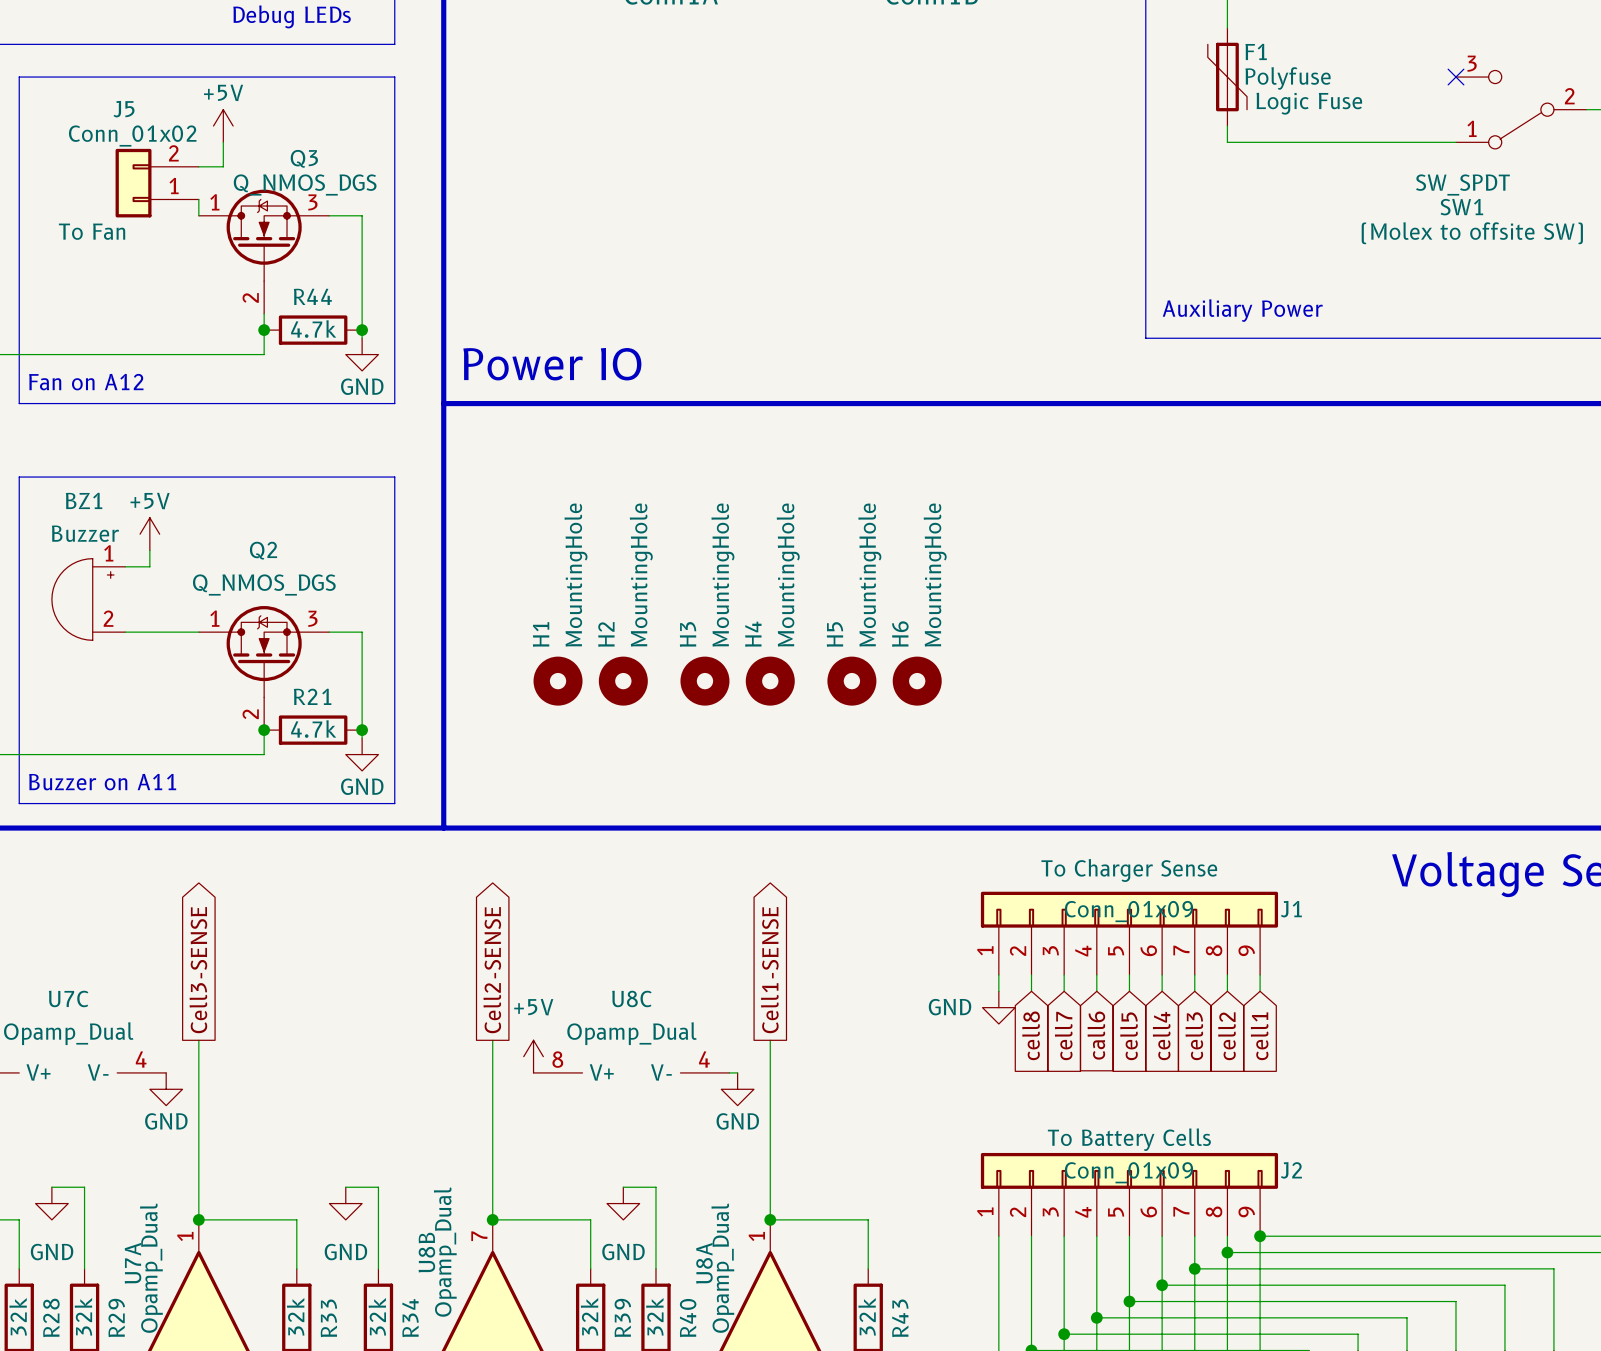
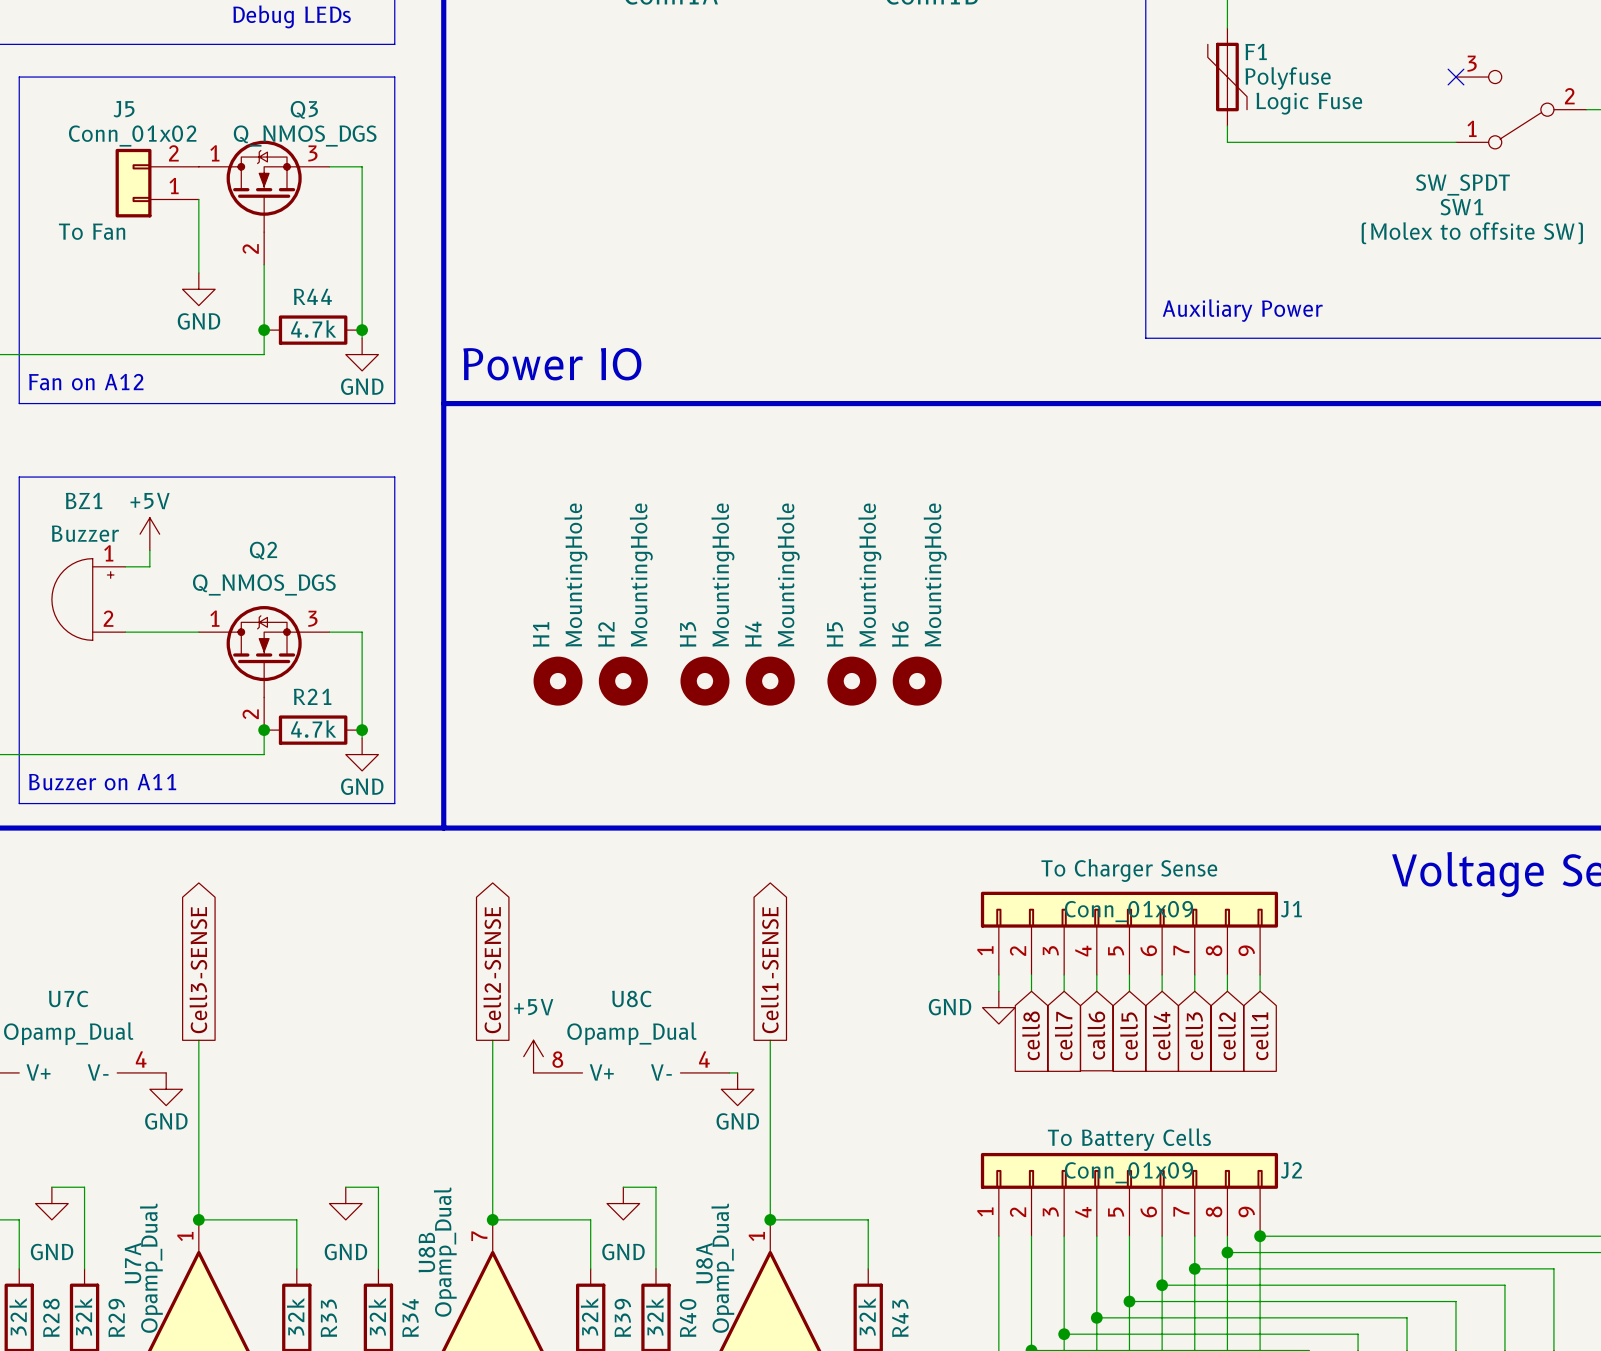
power symbol: +5V (223, 126) -> none
wire: (223, 142) (223, 166) (198, 166) -> none
wire: none -> (198, 215) (198, 272)
wire: (329, 215) (362, 215) -> (329, 166) (362, 166) (362, 215)
Q3 position: (264, 251) -> (264, 202)
power symbol: none -> GND (198, 289)

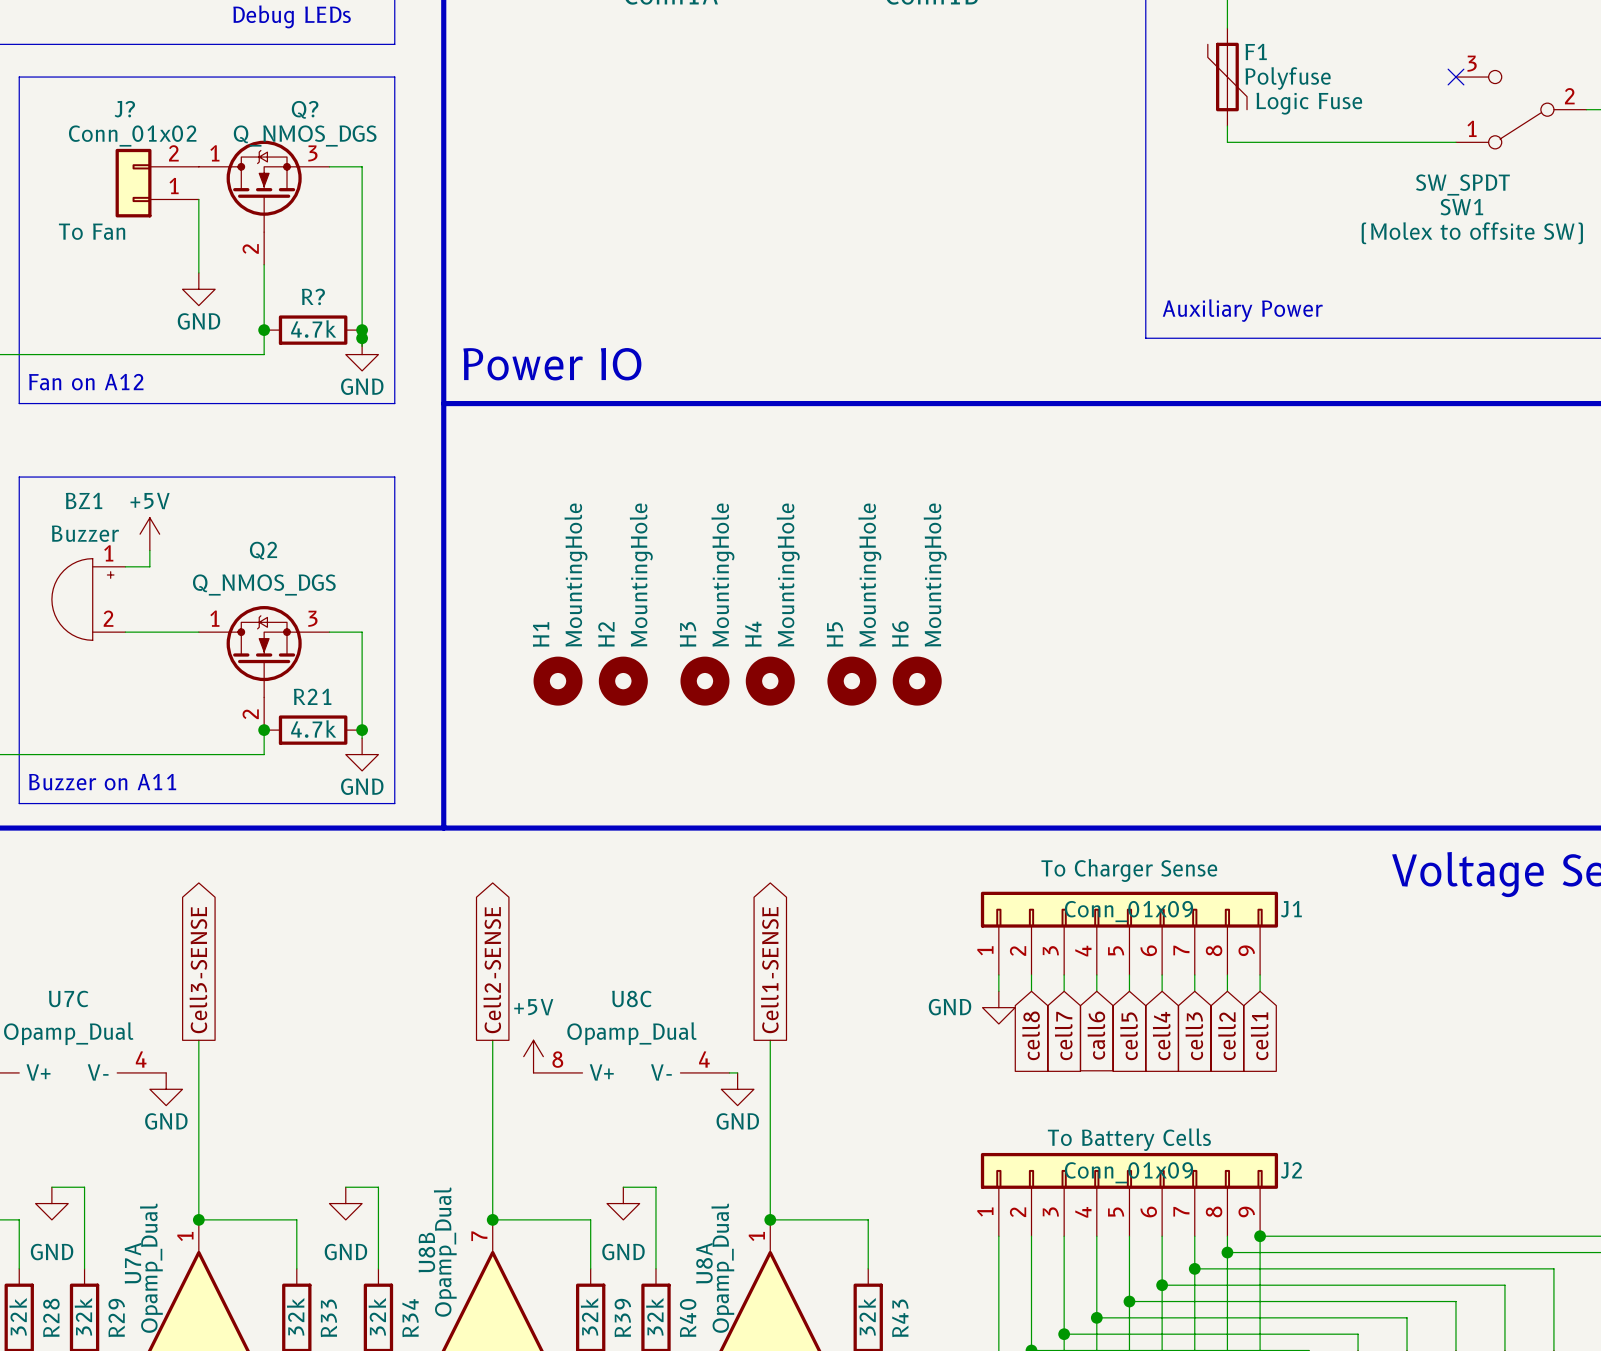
J5 name: J5 (124, 109) -> J? (124, 109)
Q3 name: Q3 (304, 109) -> Q? (305, 109)
R44 name: R44 (312, 296) -> R? (313, 296)
junction: none -> (362, 338)

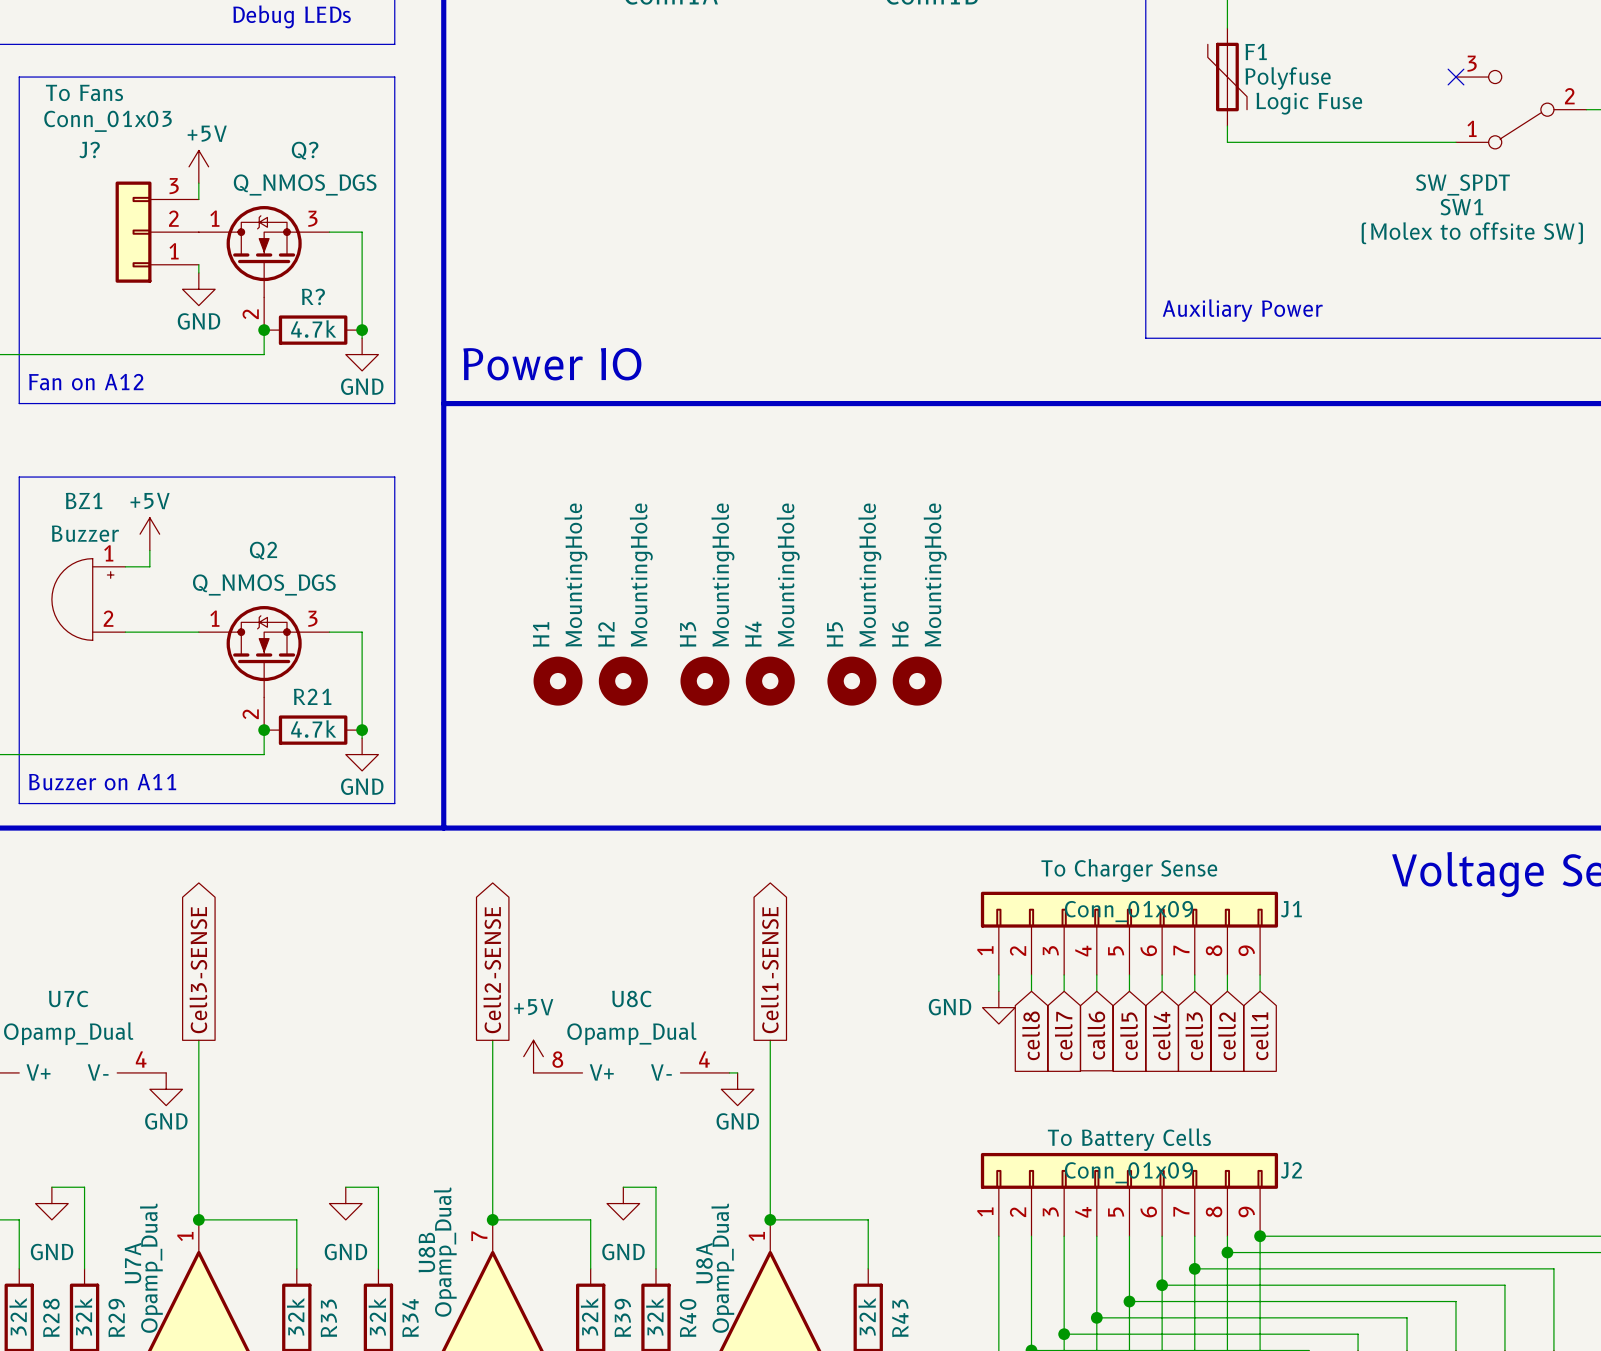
Q? name position: Q? (305, 109) -> Q? (305, 150)
Q? value position: Q_NMOS_DGS (305, 136) -> Q_NMOS_DGS (305, 184)
power symbol: none -> +5V (198, 166)
wire: (329, 166) (362, 166) (362, 232) -> (329, 232) (362, 232)
J?: Conn_01x02 (157, 183) -> none
wire: (198, 199) (198, 264) -> (198, 199) (198, 183)
Q? position: (264, 202) -> (264, 268)
J?: none -> Conn_01x03 (157, 232)
junction: (362, 338) -> none

